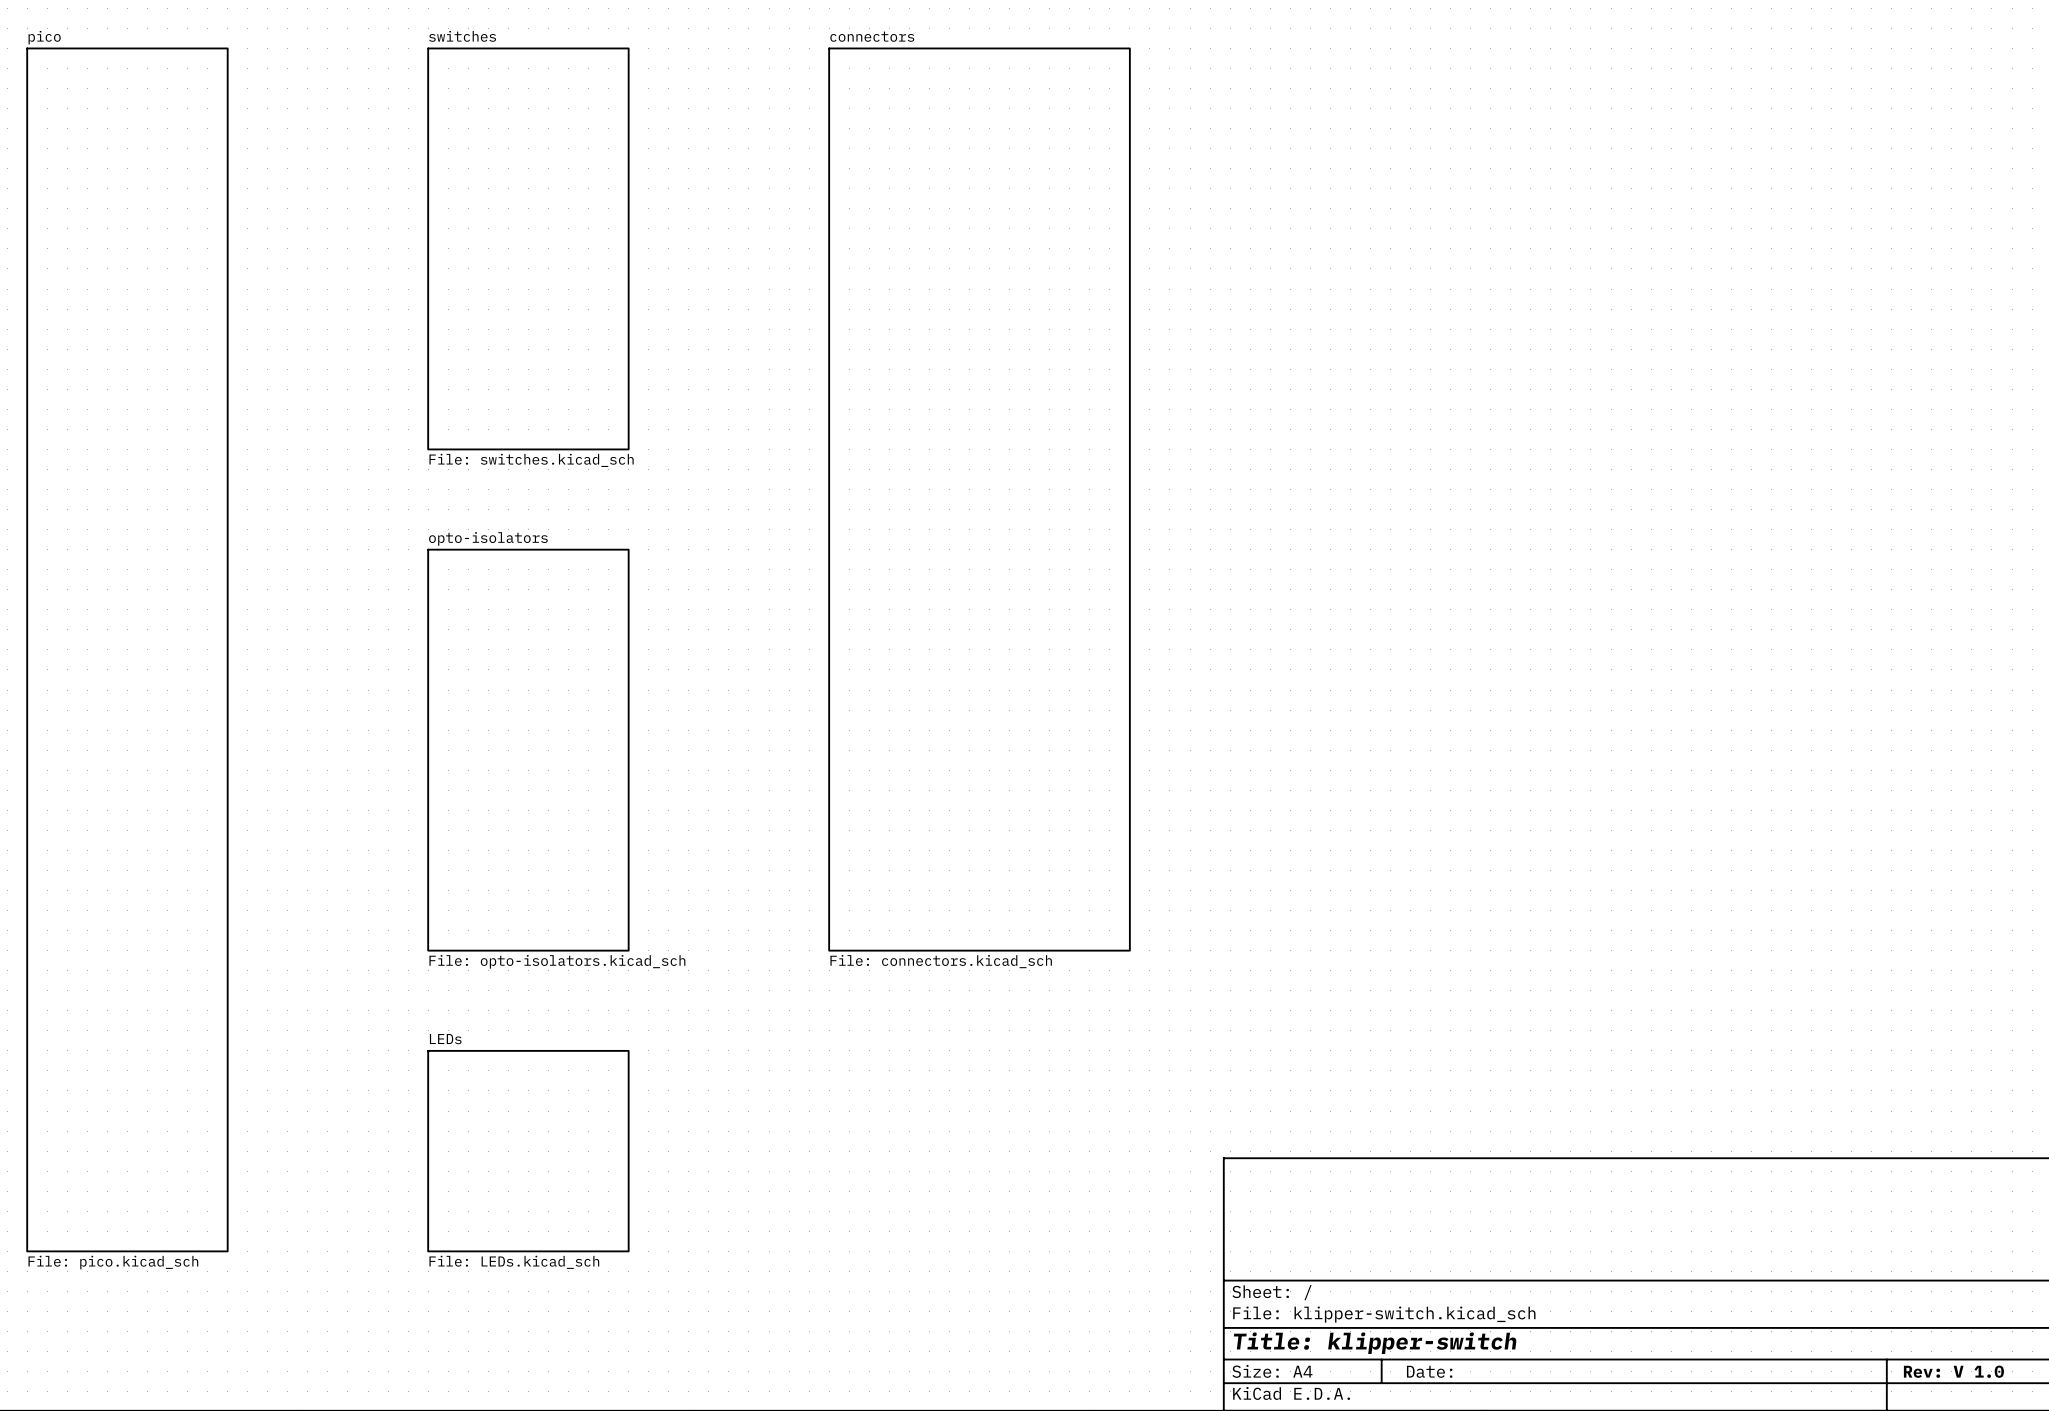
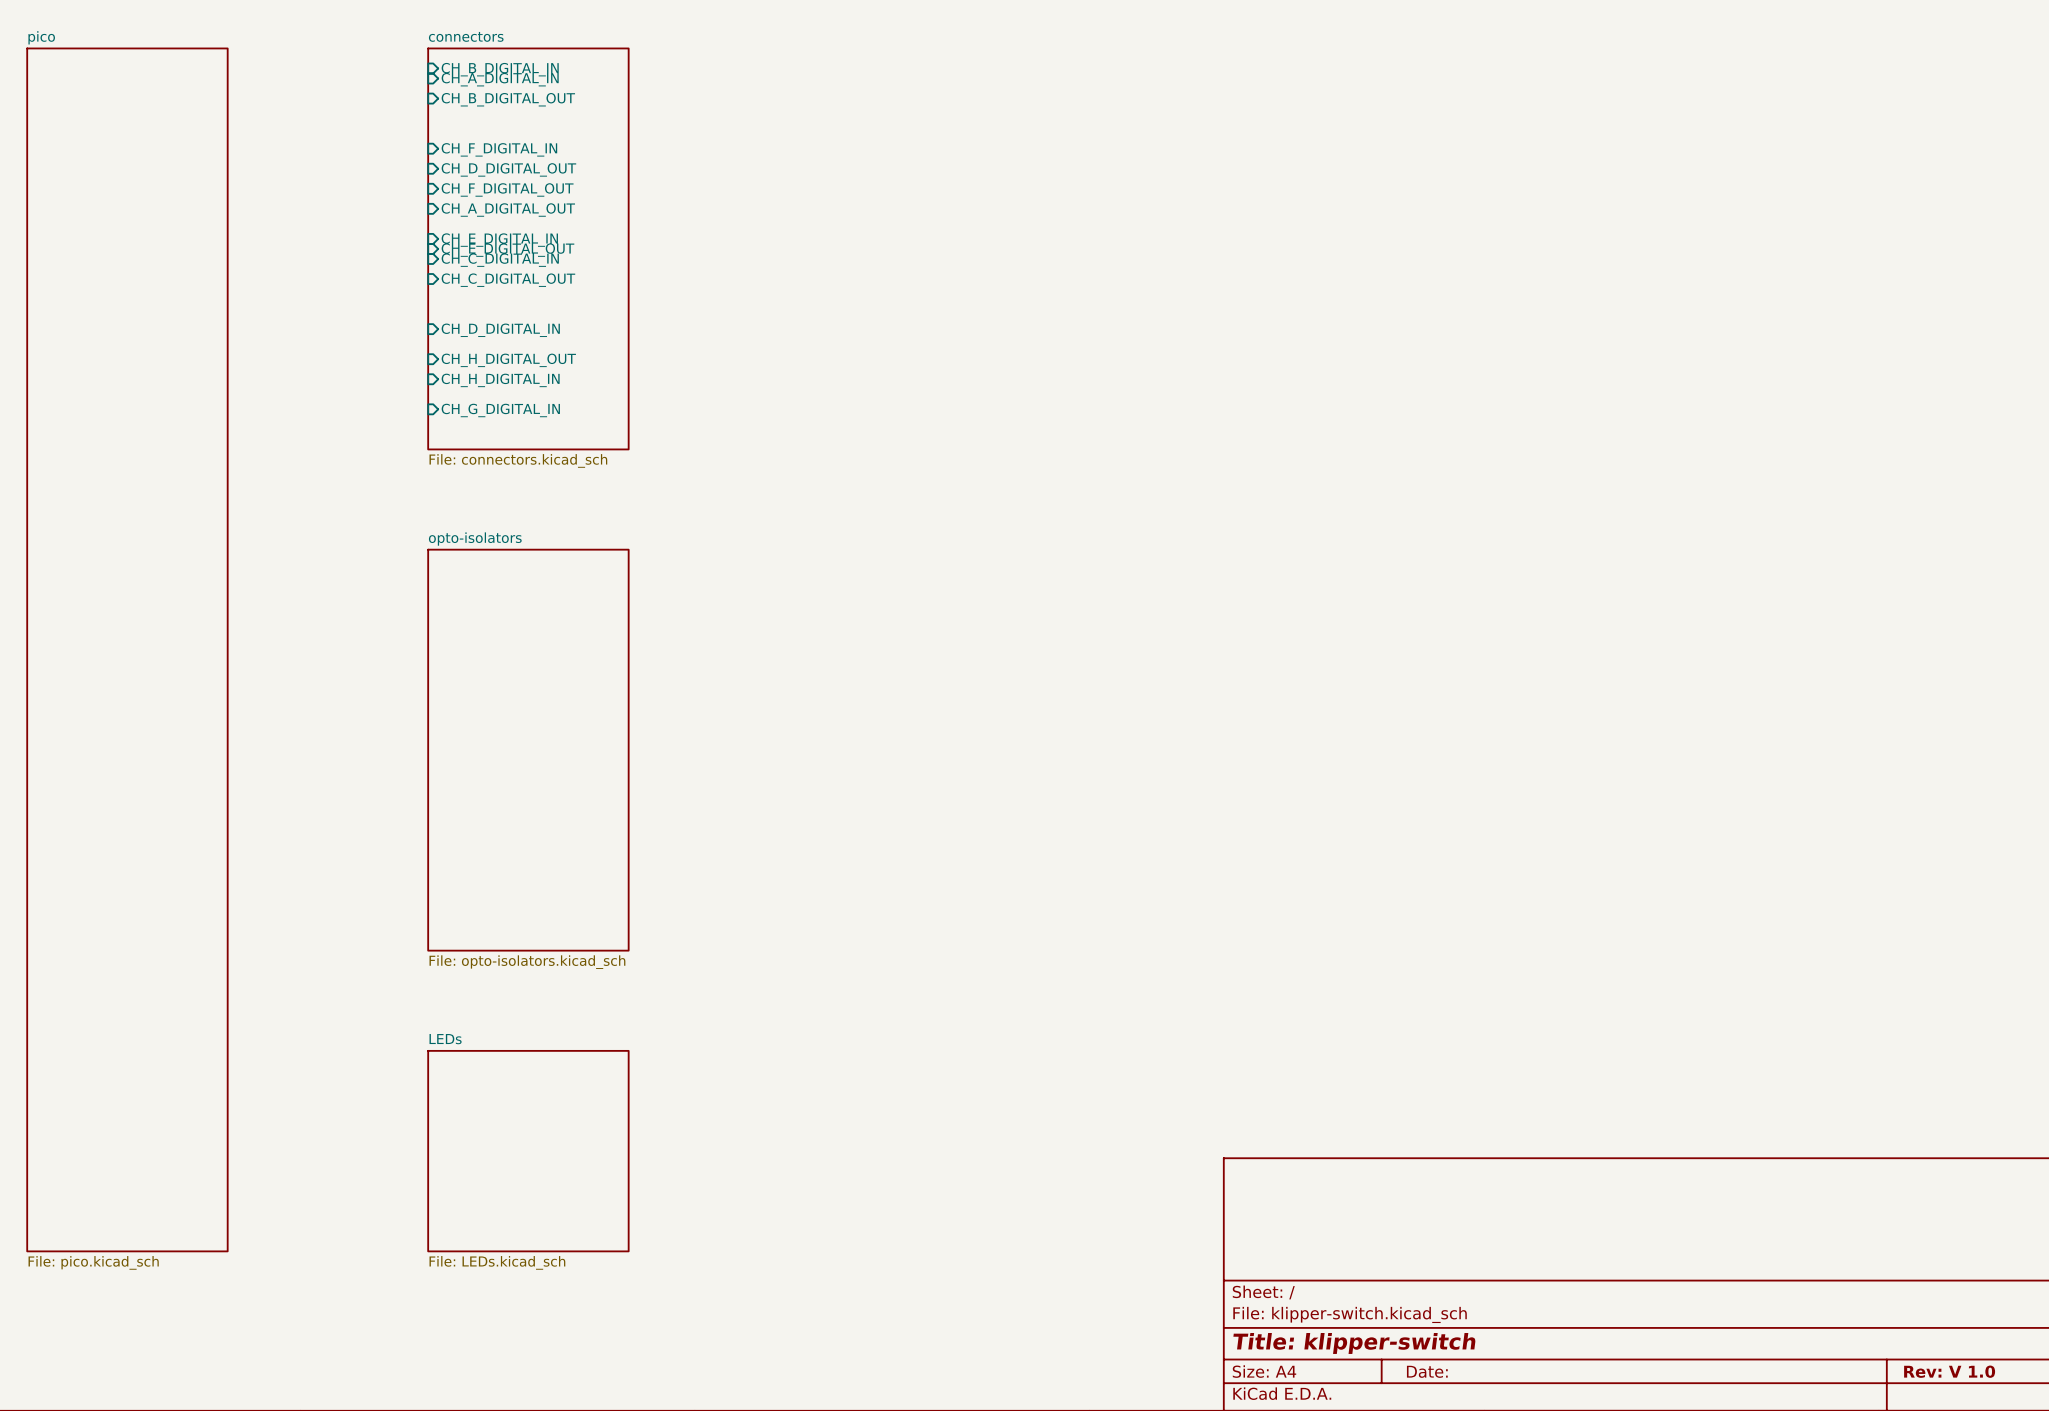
sheet switches name: switches (462, 36) -> connectors (466, 36)
sheet pin: none -> CH_B_DIGITAL_IN (500, 69)
sheet pin: none -> CH_A_DIGITAL_IN (500, 79)
sheet pin: none -> CH_B_DIGITAL_OUT (508, 99)
sheet pin: none -> CH_F_DIGITAL_IN (499, 149)
sheet pin: none -> CH_D_DIGITAL_OUT (508, 169)
sheet pin: none -> CH_F_DIGITAL_OUT (507, 189)
sheet pin: none -> CH_A_DIGITAL_OUT (508, 210)
sheet pin: none -> CH_E_DIGITAL_IN (499, 240)
sheet pin: none -> CH_E_DIGITAL_OUT (507, 250)
sheet pin: none -> CH_C_DIGITAL_IN (500, 260)
sheet pin: none -> CH_C_DIGITAL_OUT (508, 280)
sheet pin: none -> CH_D_DIGITAL_IN (500, 330)
sheet pin: none -> CH_H_DIGITAL_OUT (508, 360)
sheet pin: none -> CH_H_DIGITAL_IN (500, 380)
sheet pin: none -> CH_G_DIGITAL_IN (500, 410)
sheet switches value: File: switches.kicad_sch (531, 460) -> File: connectors.kicad_sch (518, 460)
sheet connectors: File: connectors.kicad_sch (979, 499) -> none

